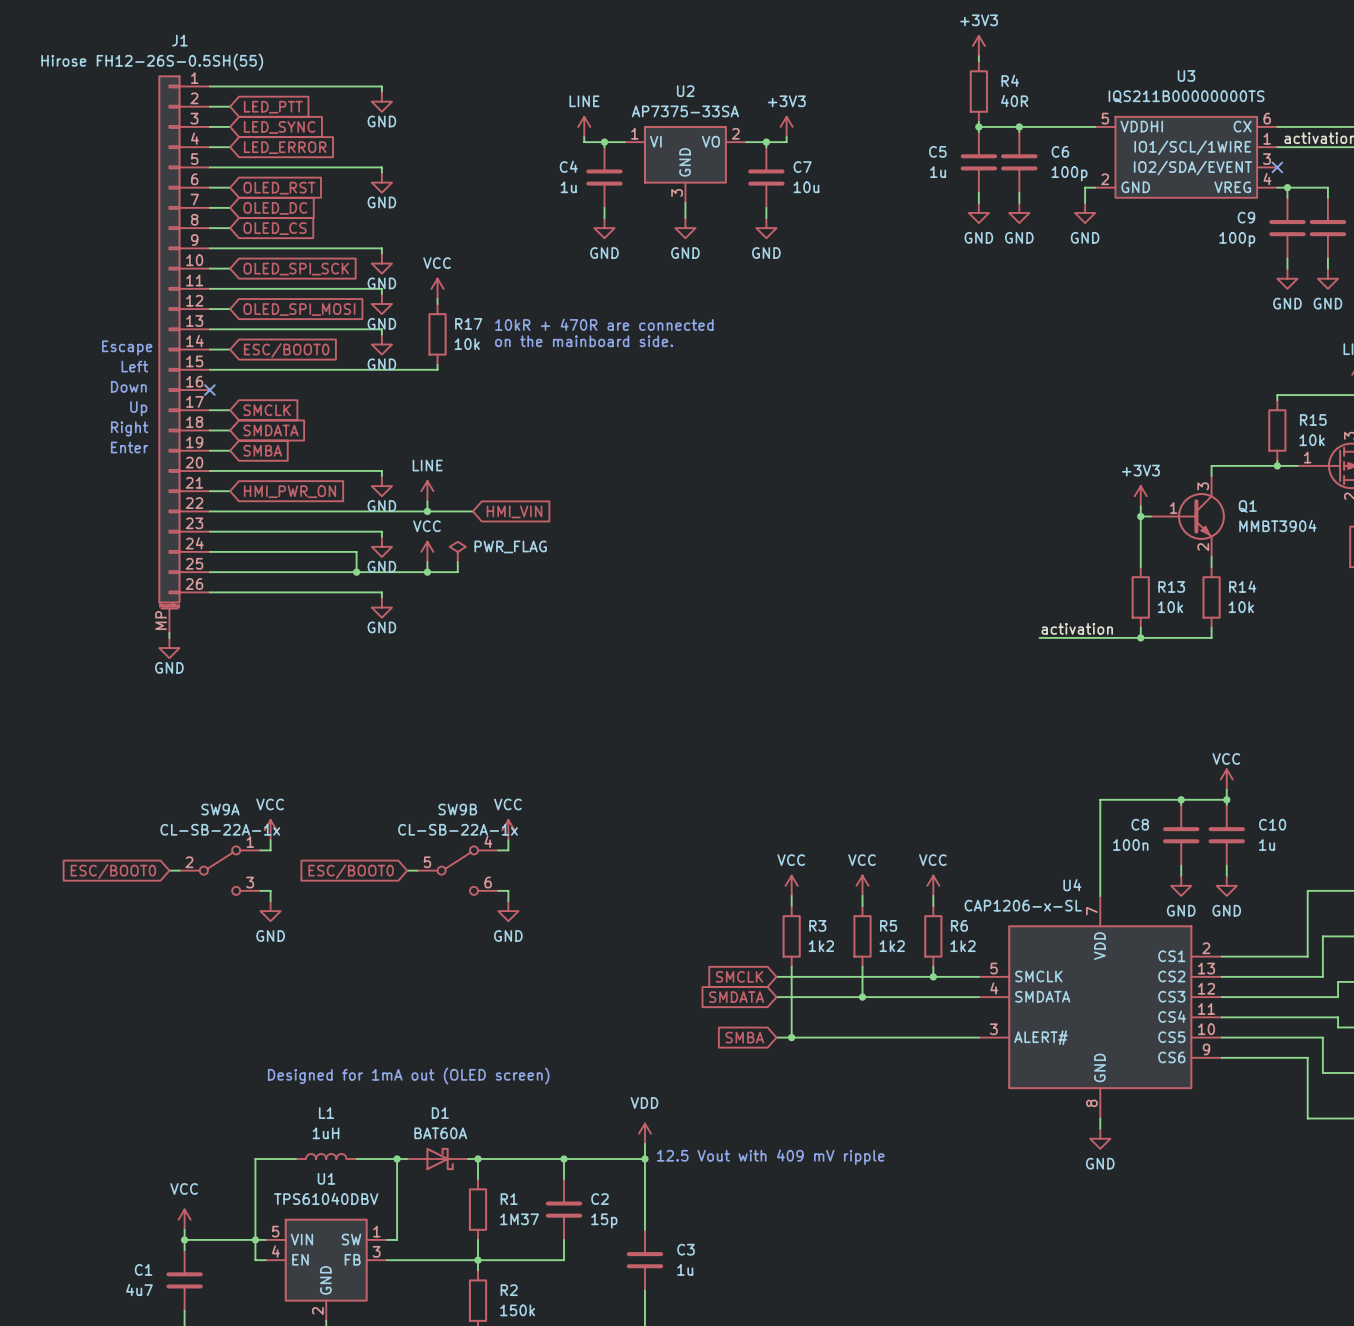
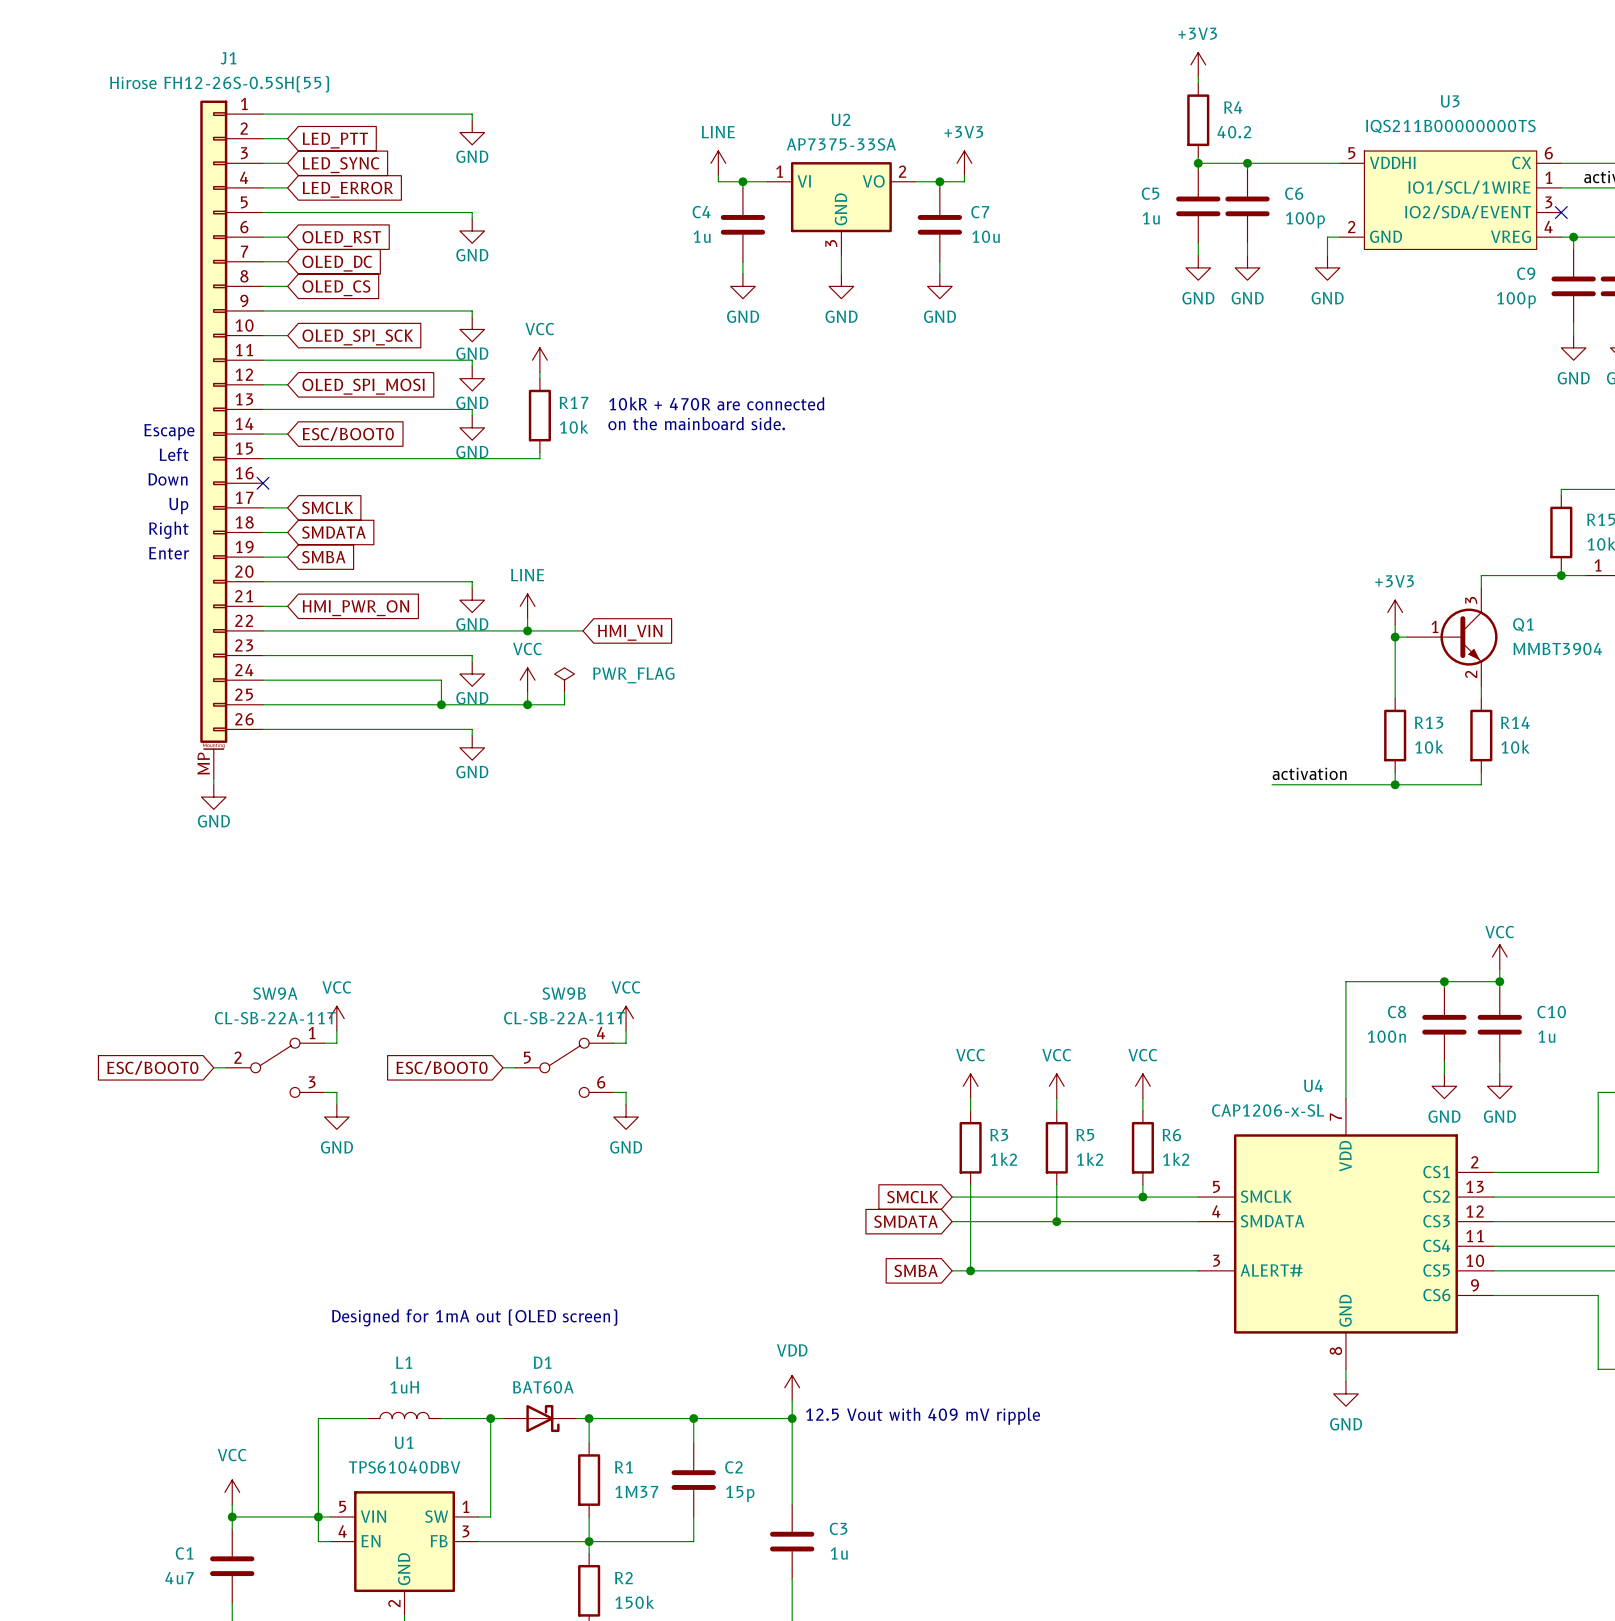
R4 value: 40R (1014, 101) -> 40.2 (1234, 132)
SW9A value: CL-SB-22A-1x (220, 829) -> CL-SB-22A-11T (275, 1018)
SW9B value: CL-SB-22A-1x (458, 829) -> CL-SB-22A-11T (564, 1018)

